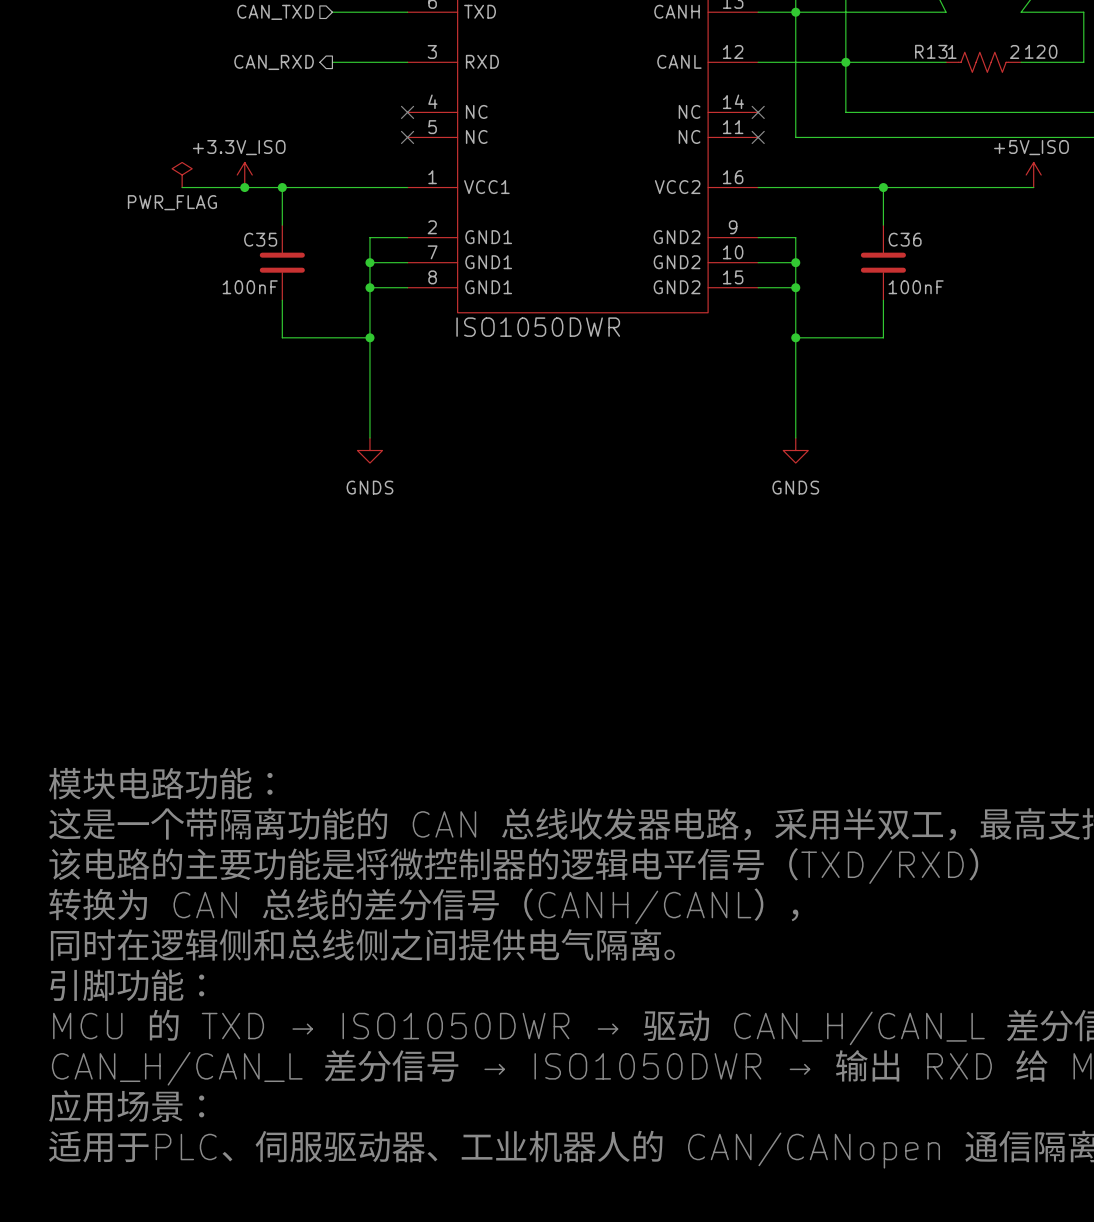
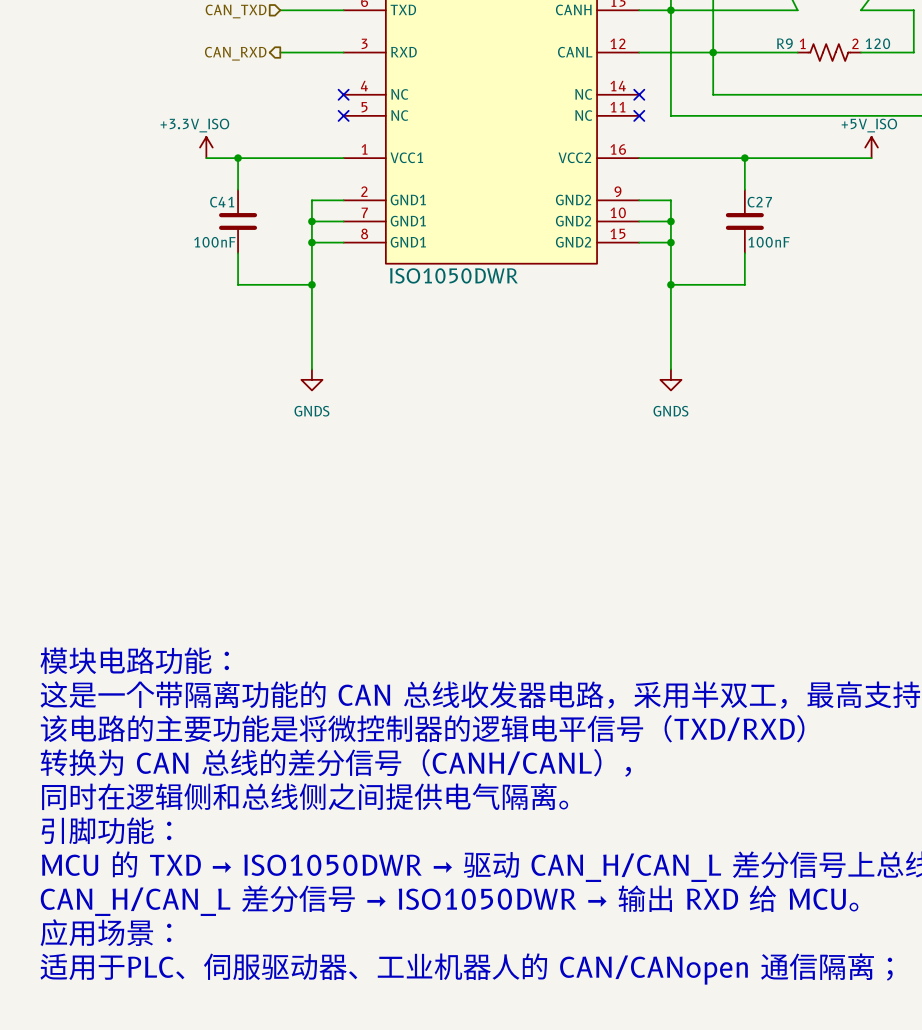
R13 name: R13 (931, 51) -> R9 (784, 43)
power symbol: PWR_FLAG (182, 175) -> none
wire: (182, 187) (244, 187) -> none
junction: (244, 187) -> none
C35 name: C35 (260, 239) -> C41 (222, 202)
C36 name: C36 (905, 239) -> C27 (759, 202)

